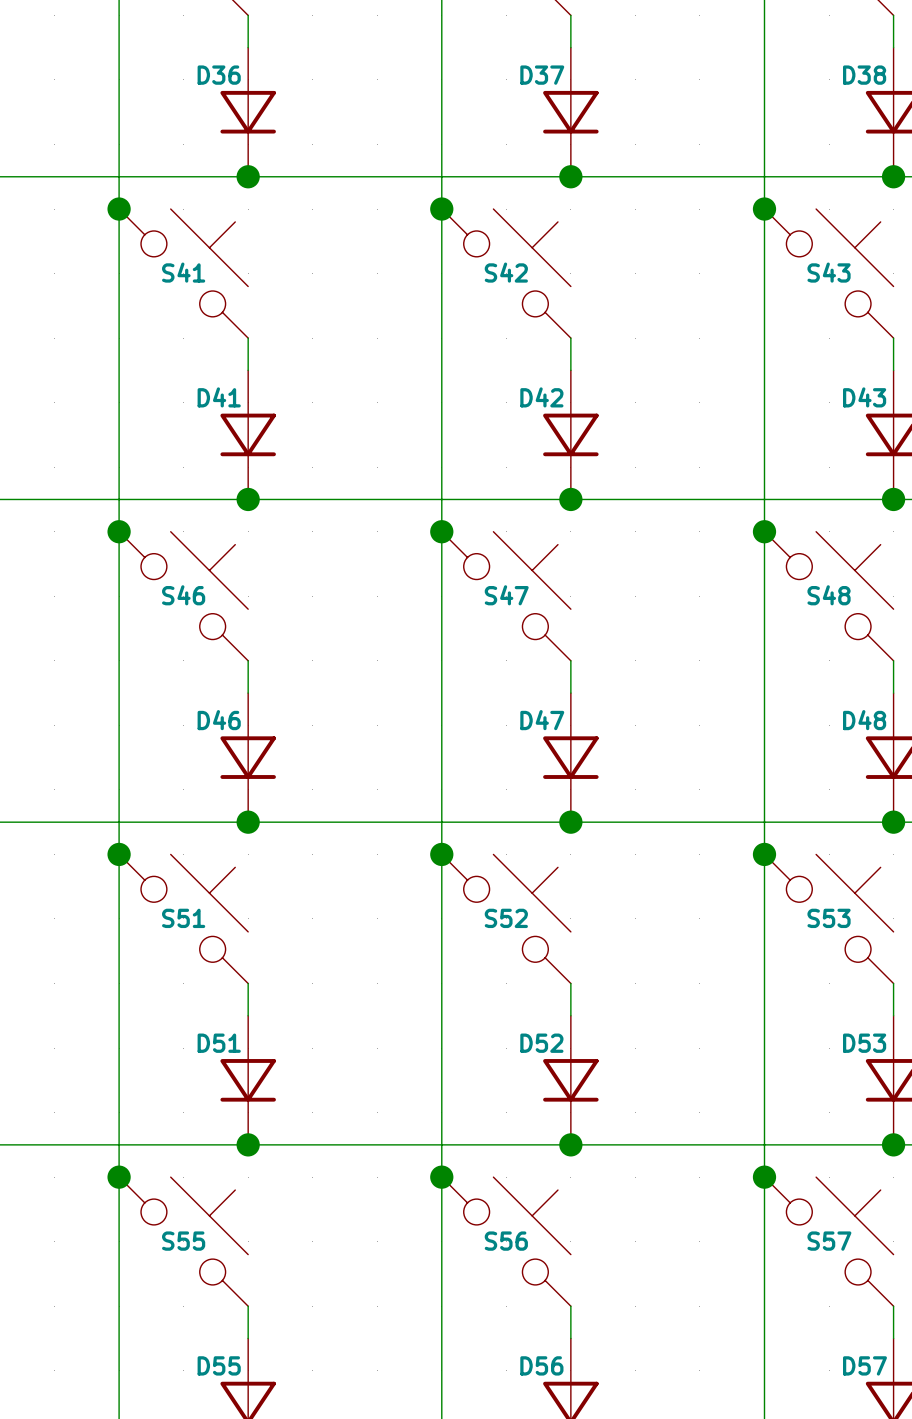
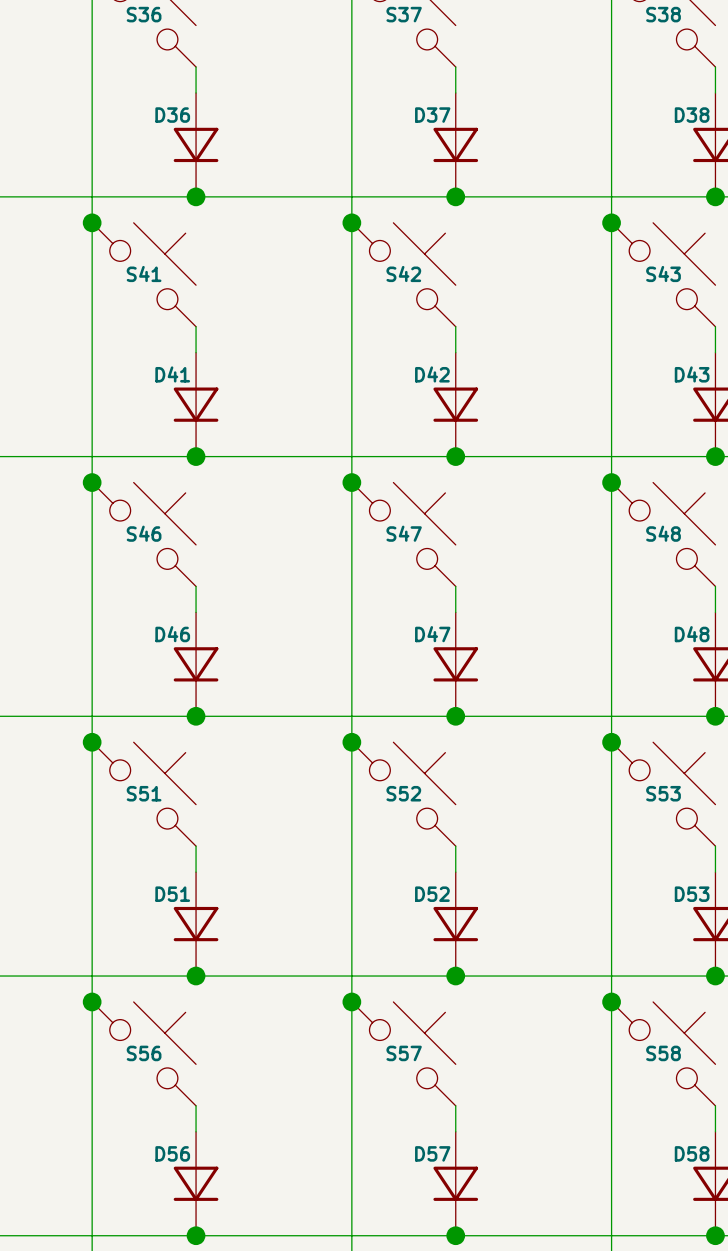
S55 name: S55 (183, 1241) -> S56 (144, 1053)
S56 name: S56 (506, 1241) -> S57 (404, 1053)
S57 name: S57 (829, 1241) -> S58 (663, 1053)
D55 name: D55 (219, 1365) -> D56 (172, 1153)
D56 name: D56 (541, 1365) -> D57 (432, 1153)
D57 name: D57 (864, 1365) -> D58 (692, 1153)

